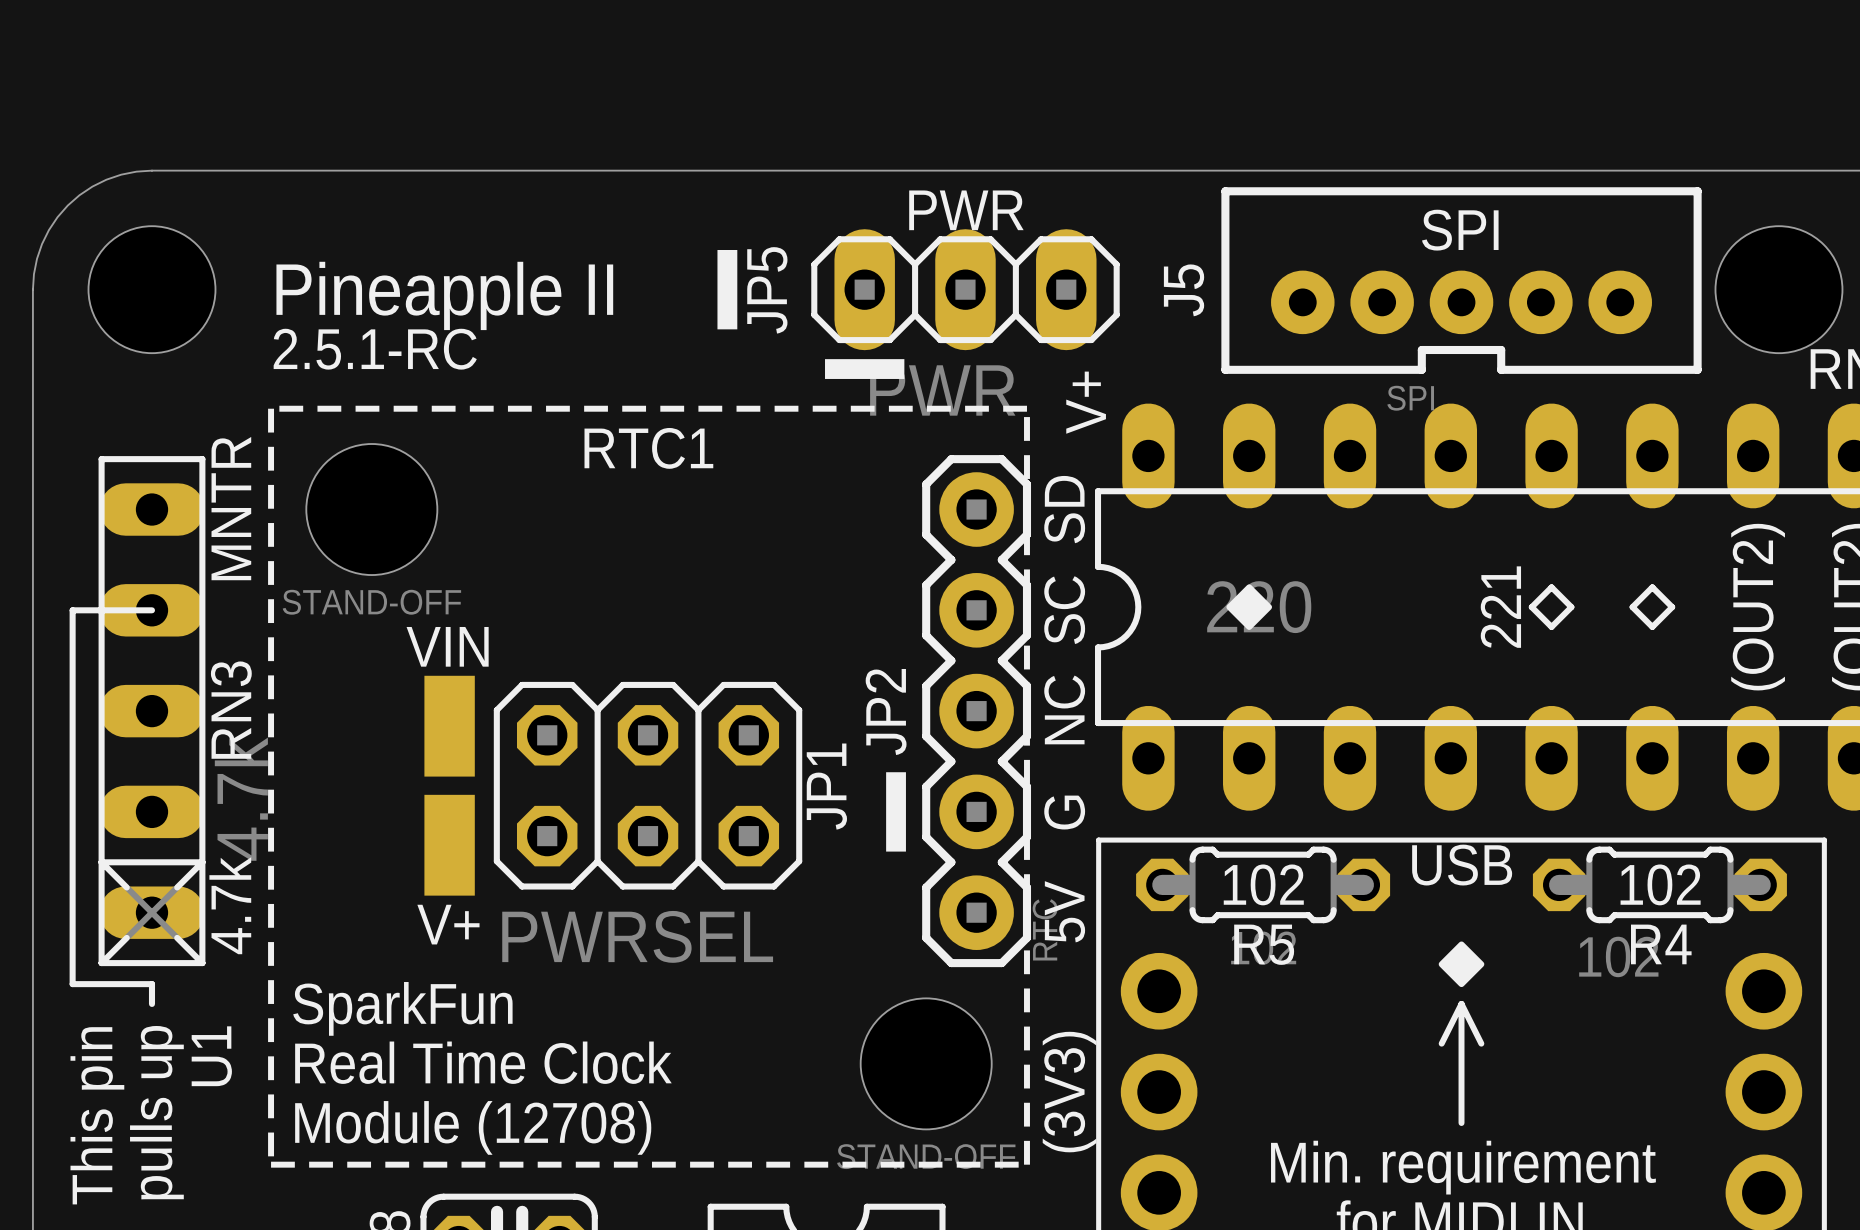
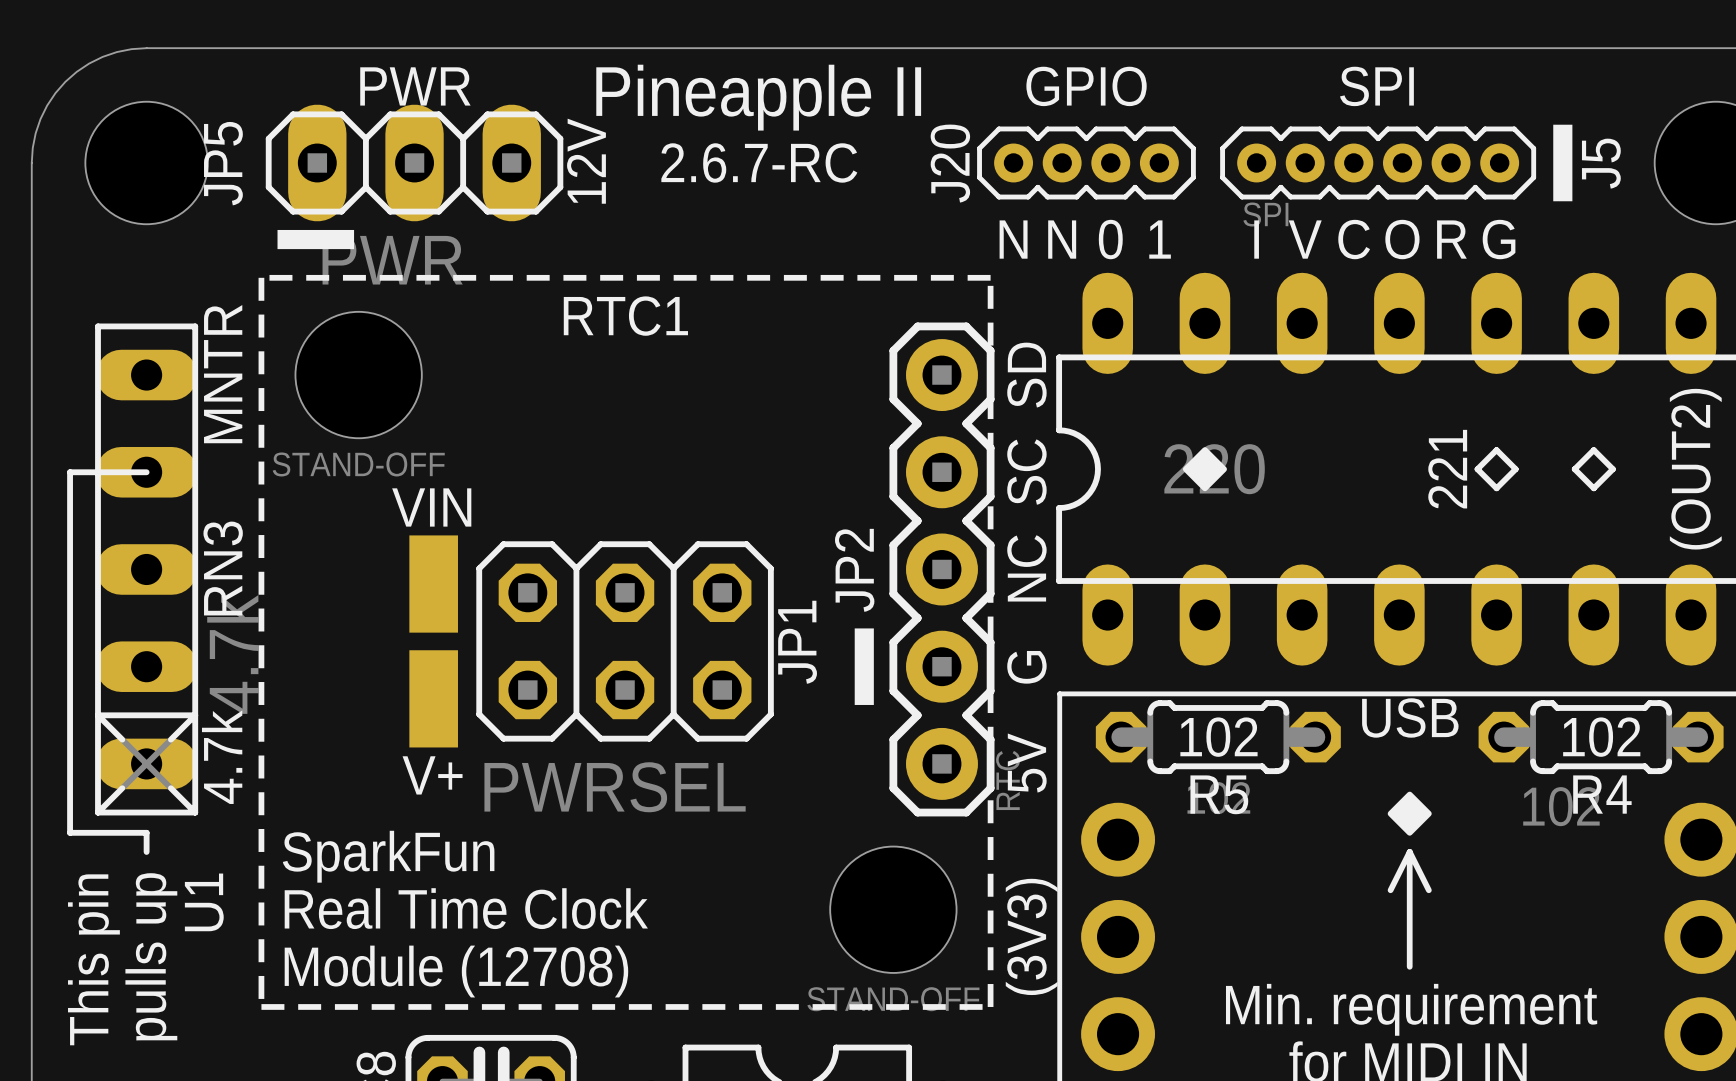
J5 footprint: [1221, 187, 1702, 374] -> [1220, 126, 1537, 200]
text position: PWR (966, 210) -> PWR (415, 86)
text: none -> GPIO (1086, 86)
text position: SPI (1460, 230) -> SPI (1376, 86)
text: none -> 12V (586, 161)
drawing position: (727, 289) -> (1562, 162)
text: none -> 2.6.7-RC (759, 162)
JP5 position: (965, 289) -> (414, 162)
J20: none -> (1086, 162)
J5 name position: J5 (1184, 290) -> J5 (1601, 163)
text position: Pineapple II (444, 295) -> Pineapple II (758, 97)
text: 2.5.1-RC (375, 349) -> none
drawing position: (864, 369) -> (315, 239)
text: none -> N (1013, 239)
text: none -> 0 (1110, 239)
text: none -> 1 (1160, 239)
text: none -> I (1256, 239)
text: none -> V (1305, 239)
text: none -> C (1354, 239)
text: none -> O (1402, 239)
text: none -> R (1451, 239)
text: none -> G (1499, 239)
J5 value position: SPI (1410, 398) -> SPI (1265, 214)
text: V+ (1086, 402) -> N (1062, 239)

